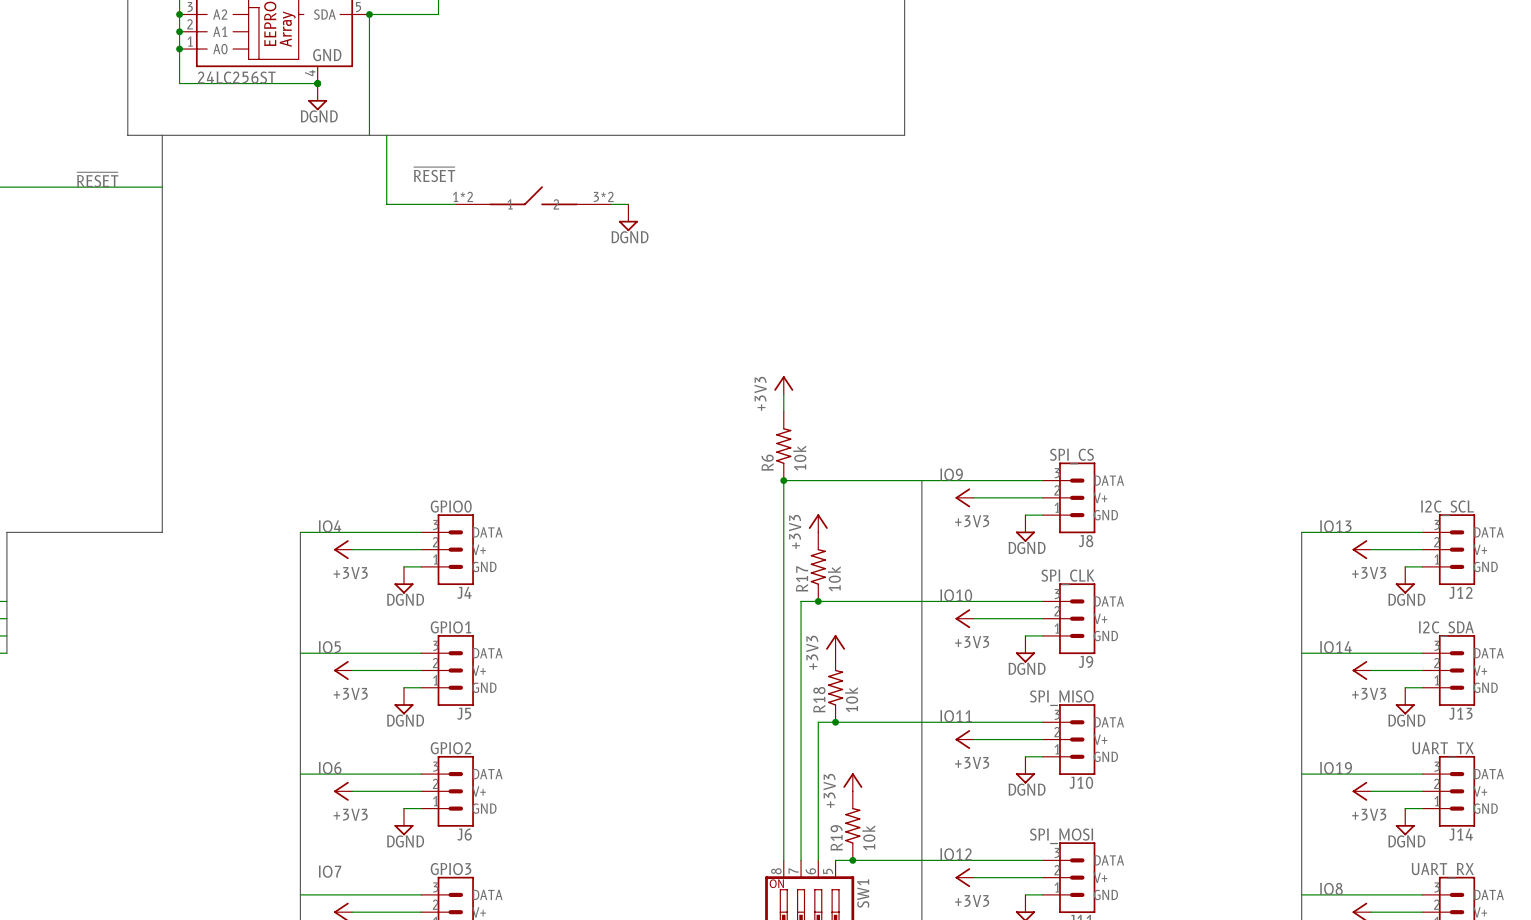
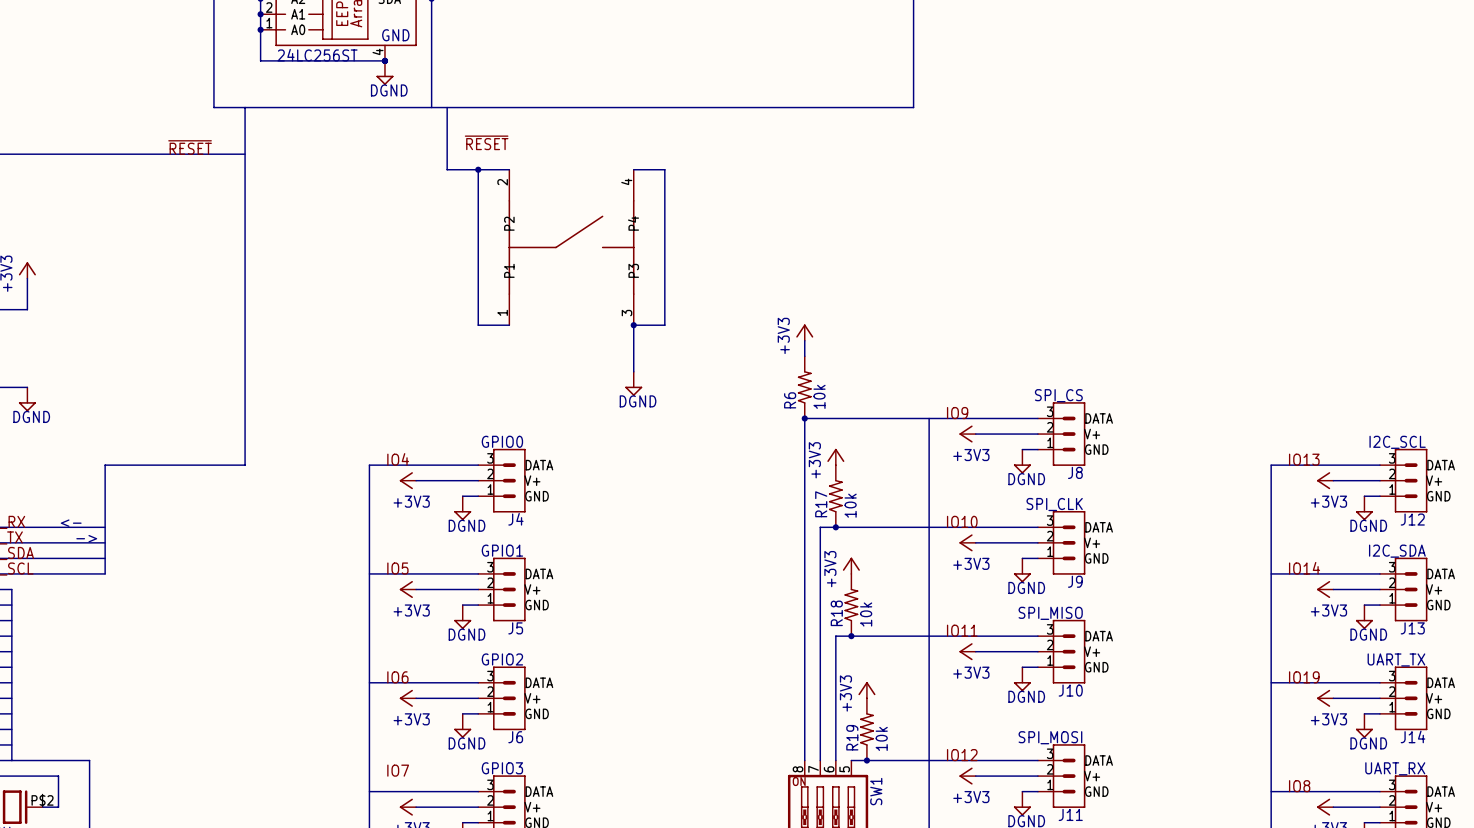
part: (533, 195) -> none
wire: none -> (478, 169) (478, 325) (509, 325)
junction: none -> (478, 169)
wire: none -> (664, 169) (664, 325) (633, 325) (633, 371)
power symbol: DGND (628, 217) -> none
part: none -> (571, 247)
junction: none -> (633, 325)
power symbol: none -> DGND (633, 383)

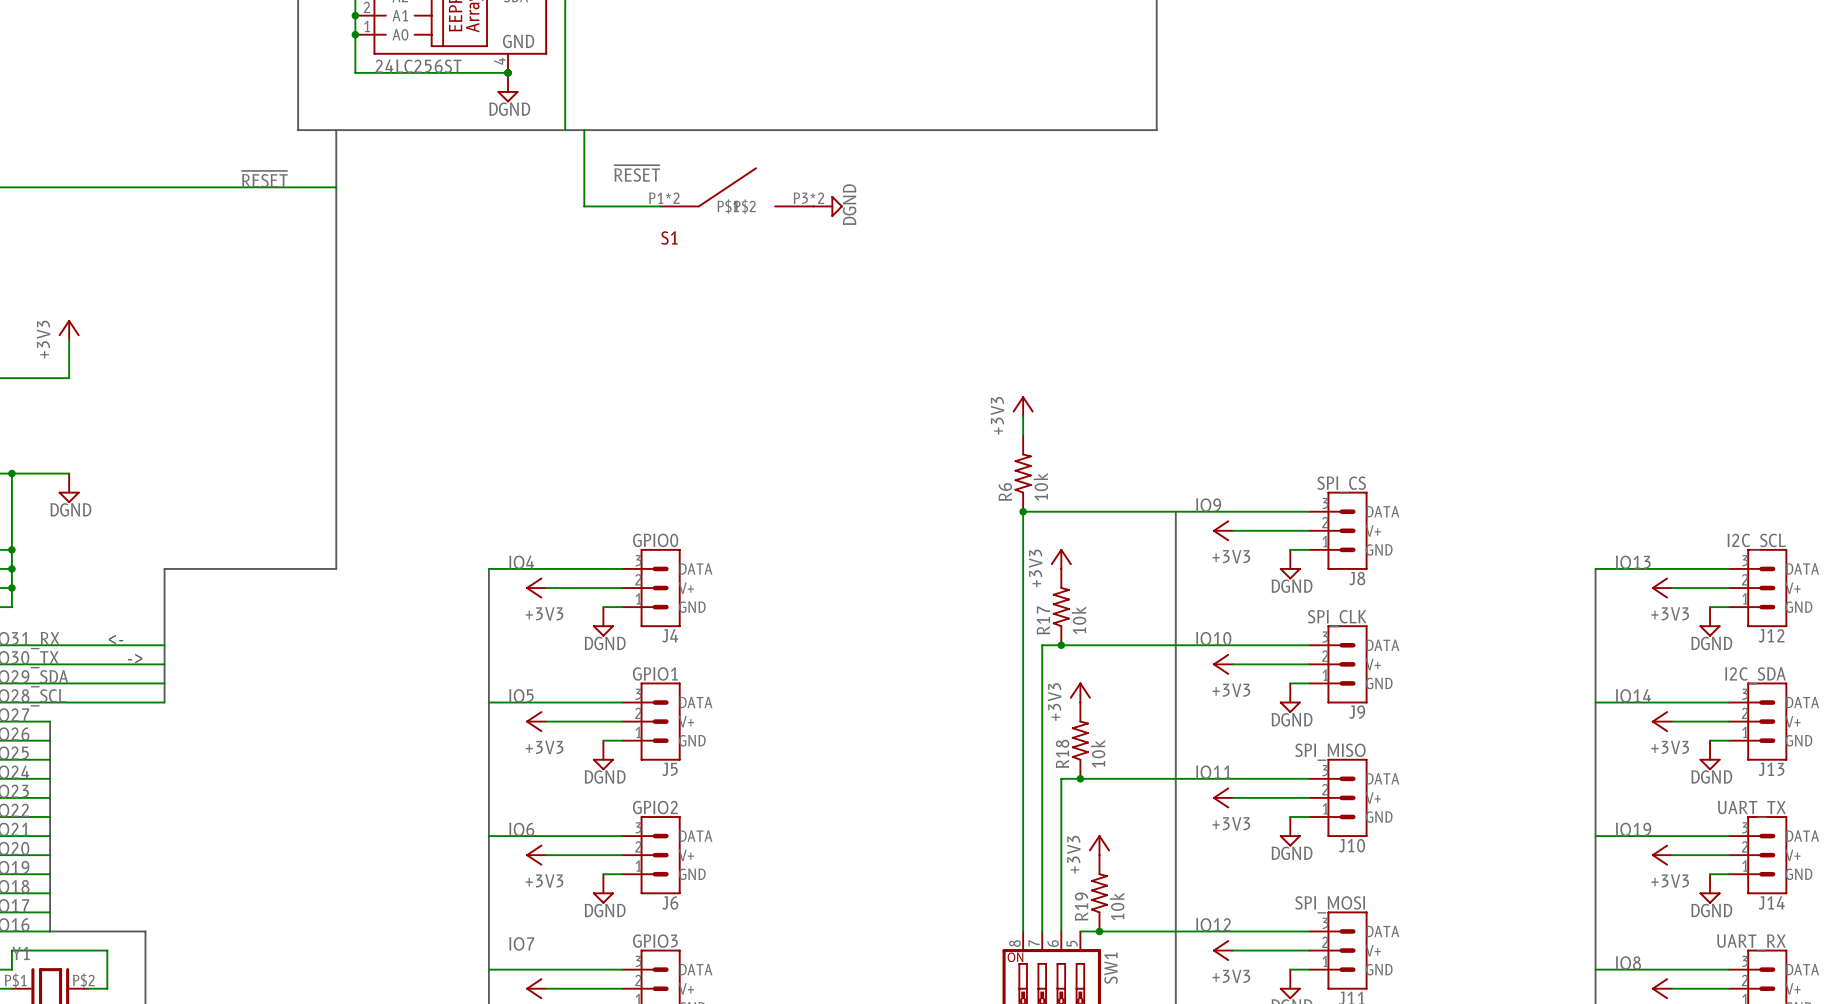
S1: none -> (736, 187)
wire: (478, 169) (478, 325) (509, 325) -> none
junction: (478, 169) -> none
wire: (633, 169) (664, 169) (664, 325) (633, 325) (633, 371) -> none
power symbol: none -> DGND (828, 206)
part: (571, 247) -> none
junction: (633, 325) -> none
power symbol: DGND (633, 383) -> none

